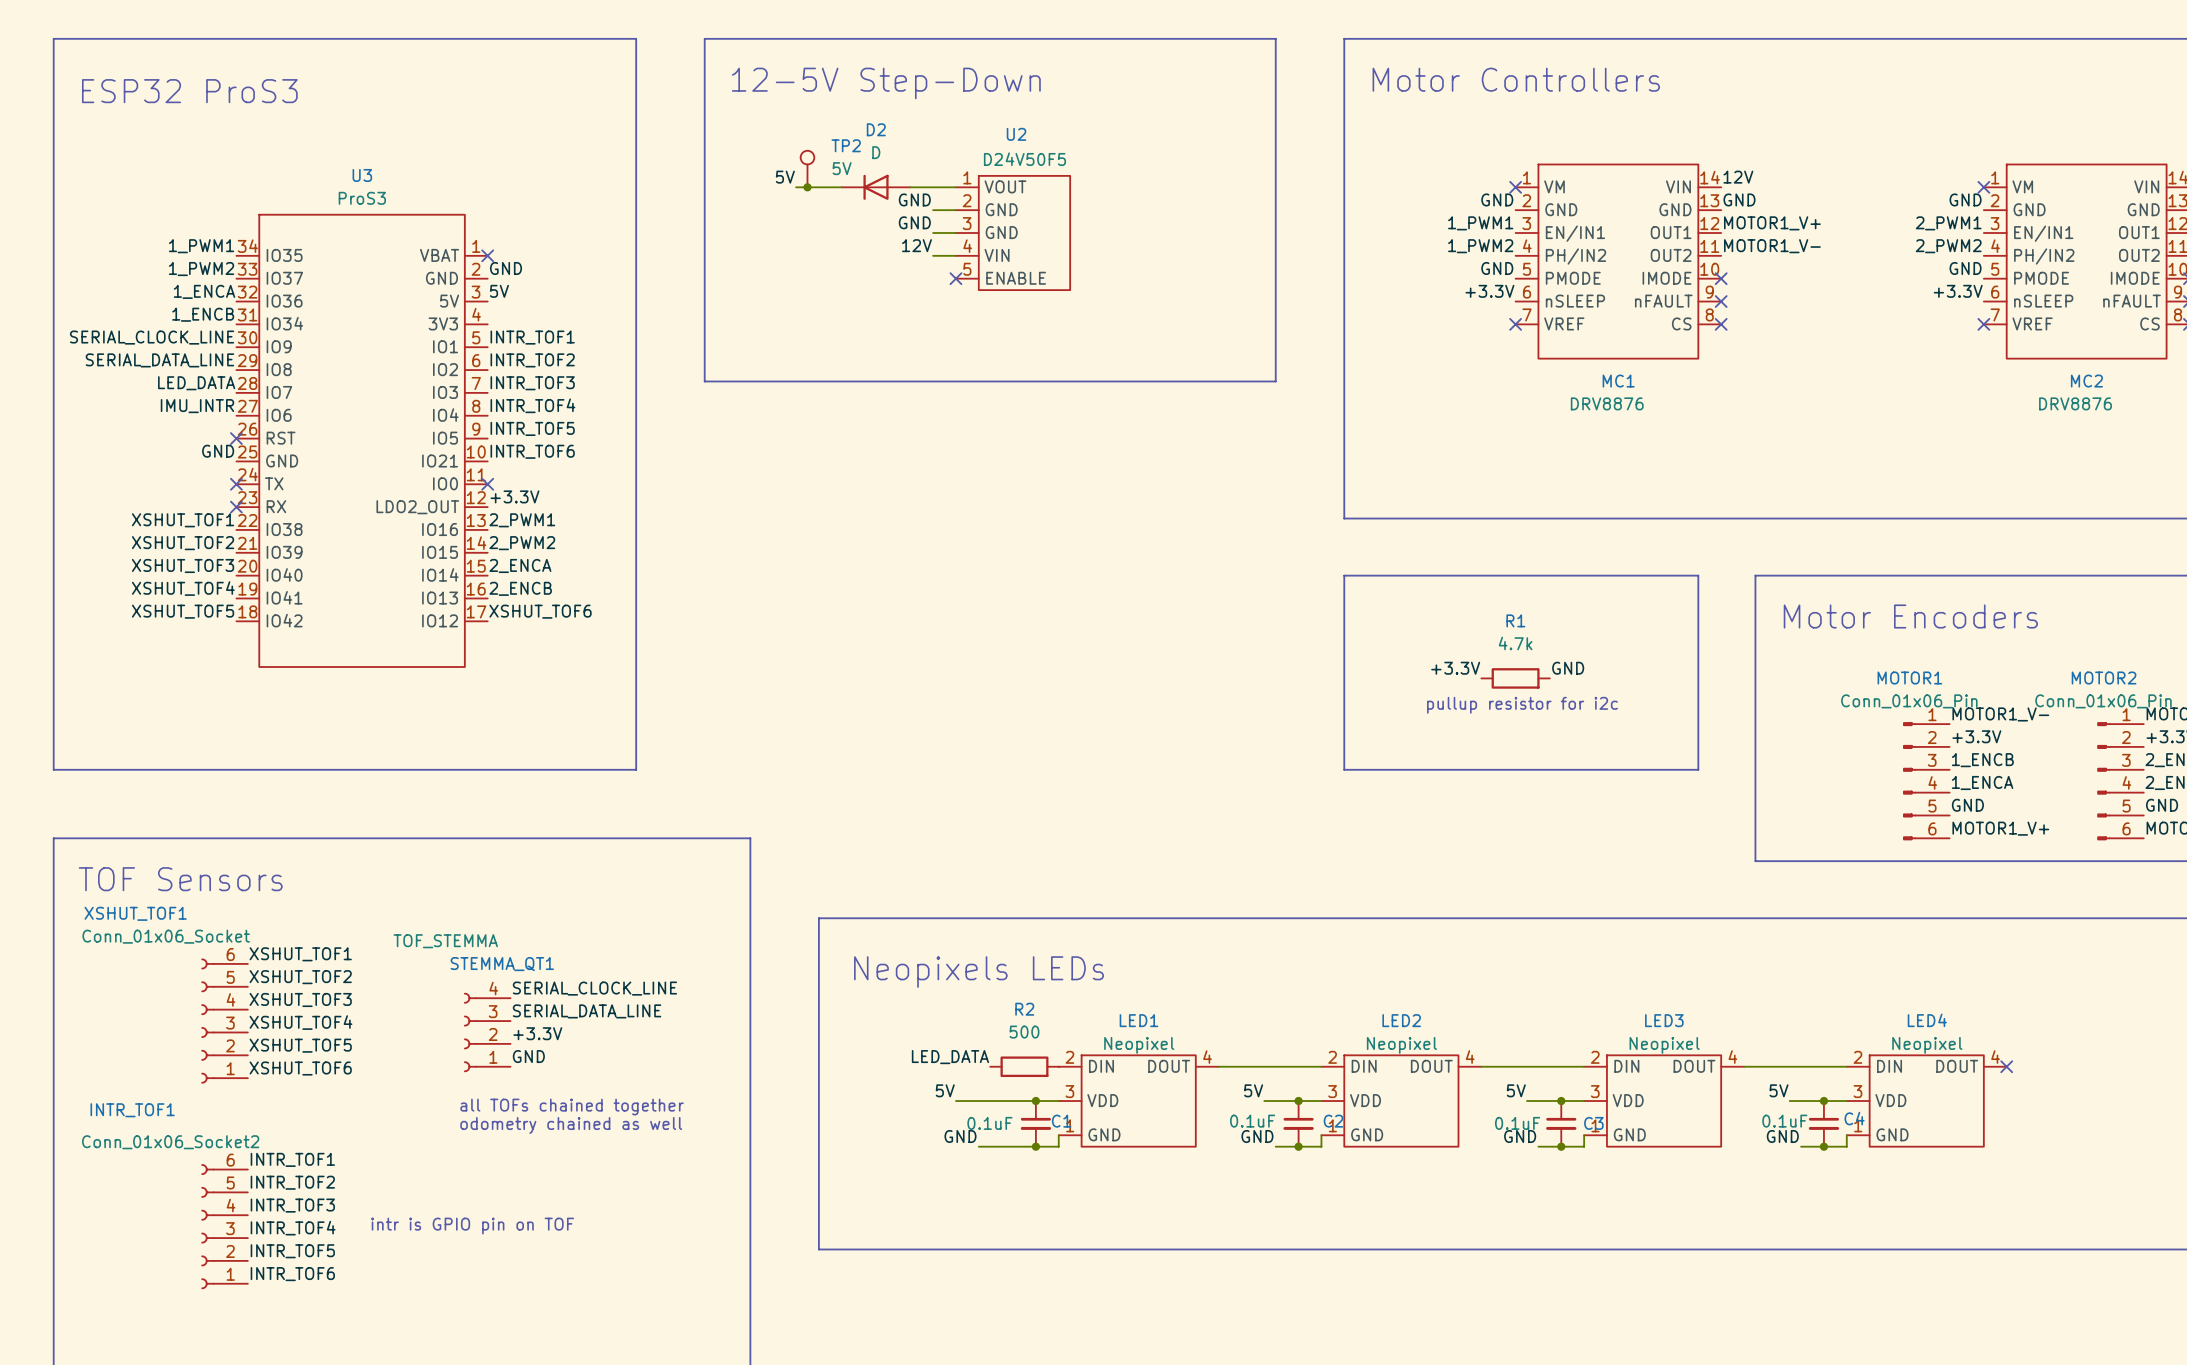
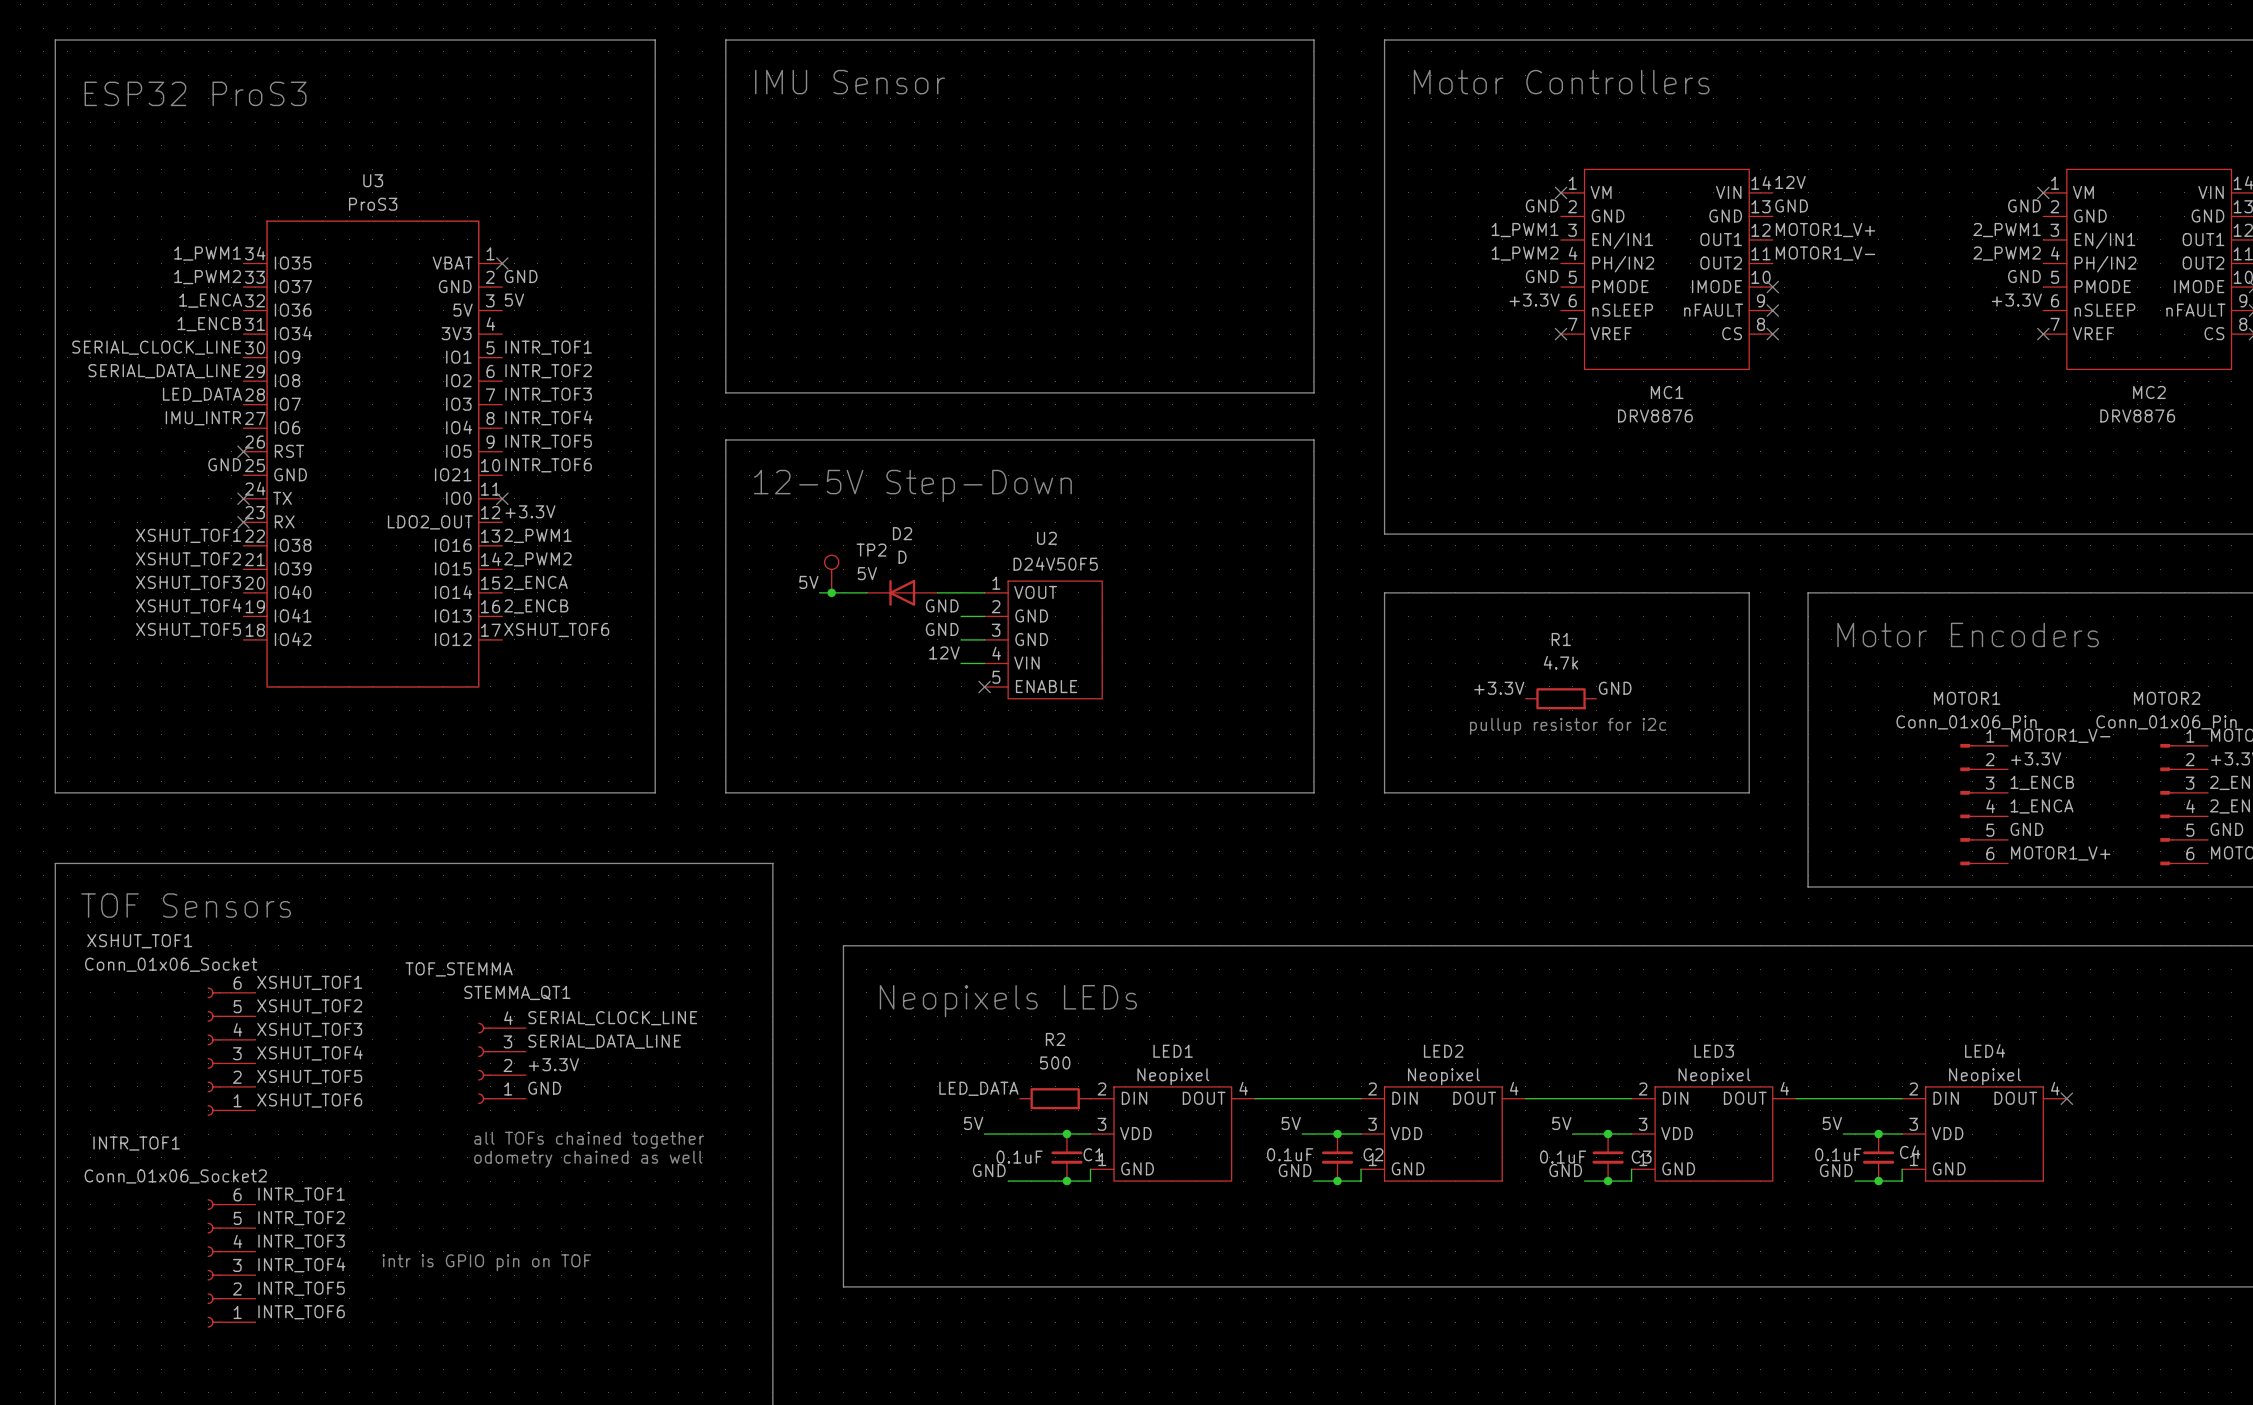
text: 12-5V Step-Down (886, 83) -> IMU Sensor (850, 82)
TP2 position: (807, 169) -> (831, 574)
label: 5V (785, 177) -> none
wire: (796, 187) (841, 187) -> none
junction: (807, 187) -> none
D2 position: (876, 187) -> (902, 592)
wire: (910, 187) (955, 187) -> none
label: GND (914, 199) -> none
wire: (933, 210) (955, 210) -> none
label: GND (914, 222) -> none
wire: (933, 233) (955, 233) -> none
U2 position: (1013, 233) -> (1043, 639)
label: 12V (916, 245) -> none
wire: (933, 255) (955, 255) -> none
no-connect mark: (955, 278) -> none
line: none -> (725, 439) (1313, 439) (1313, 792) (725, 792) (725, 439)
text: none -> 12-5V Step-Down (912, 485)
label: none -> 5V (808, 582)
wire: none -> (819, 592) (866, 592)
junction: none -> (831, 592)
wire: none -> (937, 592) (984, 592)
label: none -> GND (942, 605)
wire: none -> (961, 616) (984, 616)
label: none -> GND (942, 629)
wire: none -> (961, 639) (984, 639)
label: none -> 12V (944, 652)
wire: none -> (961, 663) (984, 663)
no-connect mark: none -> (984, 686)

